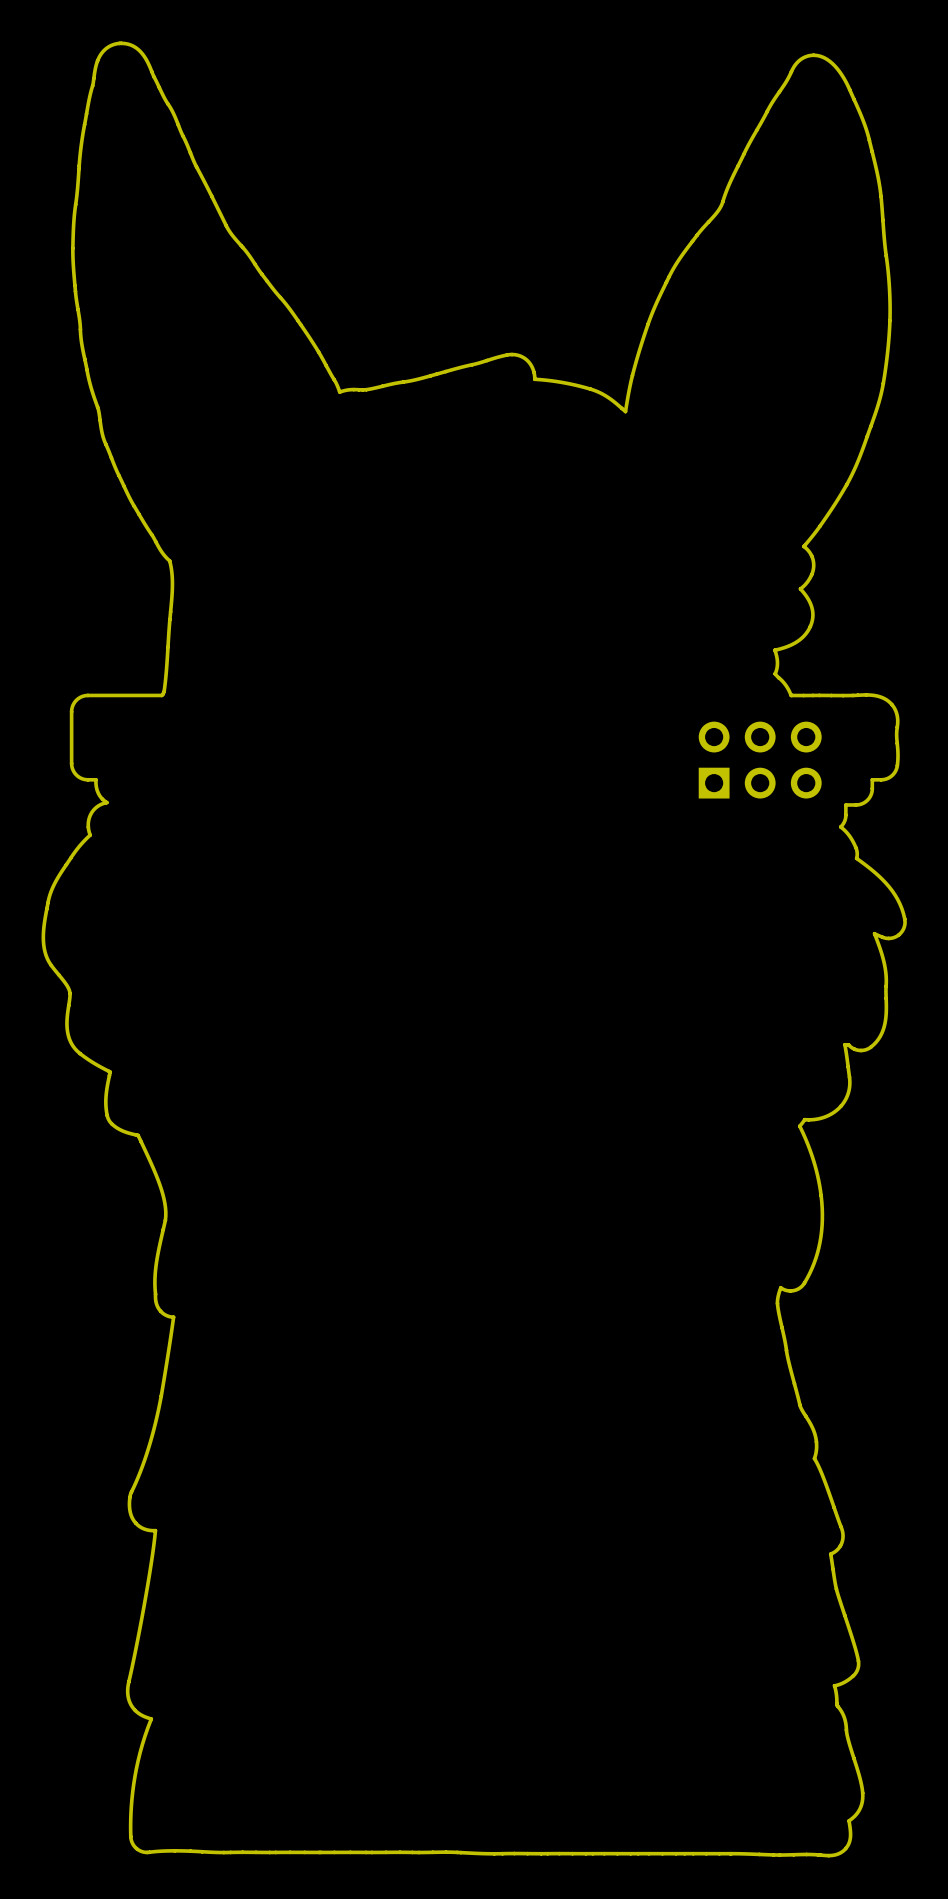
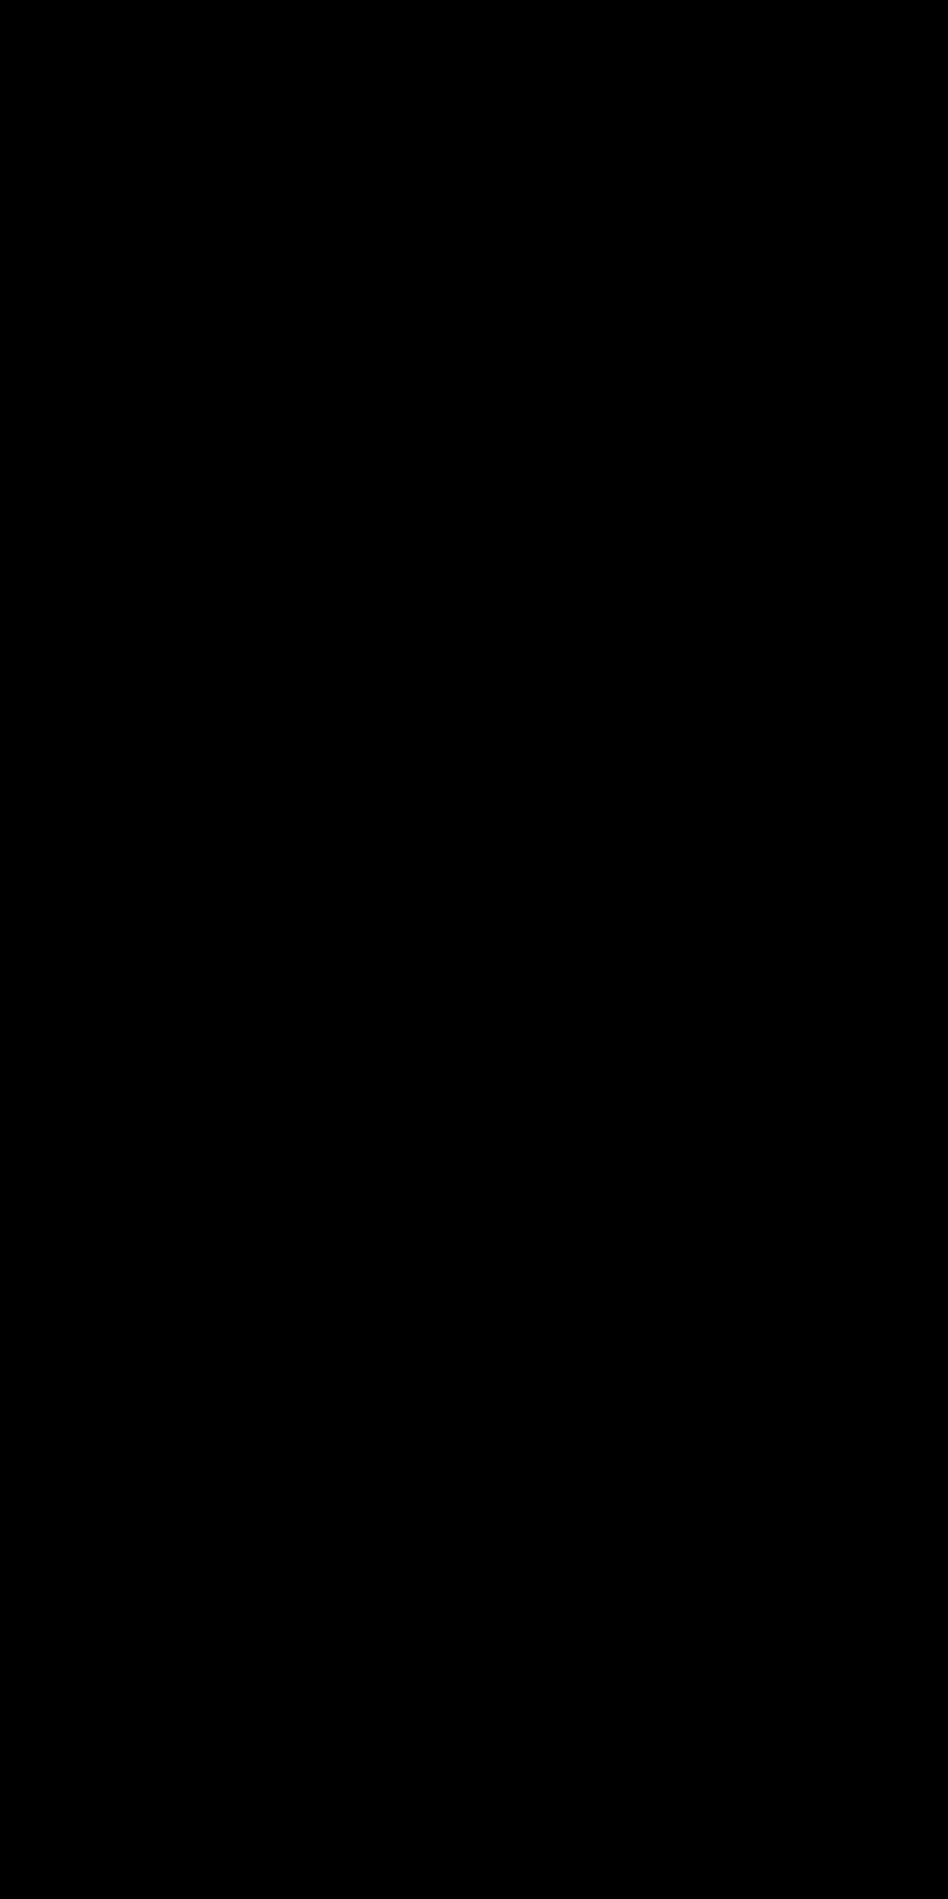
board edge: (121, 43) (133, 46) (145, 58) (227, 228) (303, 328) (320, 355) (339, 392) (368, 389) (413, 380) (513, 354) (521, 356) (528, 361) (533, 370) (534, 379) (562, 382) (593, 390) (608, 397) (625, 411) (631, 377) (642, 341) (653, 310) (669, 276) (686, 249) (719, 208) (748, 144) (796, 62) (804, 57) (813, 55) (823, 57) (832, 63) (846, 82) (862, 118) (879, 184) (888, 280) (889, 328) (883, 379) (876, 411) (852, 472) (831, 509) (803, 546) (810, 554) (813, 563) (810, 577) (800, 588) (811, 607) (812, 617) (810, 626) (797, 641) (774, 650) (777, 662) (775, 673) (785, 684) (791, 695) (877, 696) (891, 704) (897, 719) (897, 759) (895, 771) (886, 778) (872, 779) (871, 793) (865, 802) (857, 804) (845, 804) (845, 818) (840, 826) (853, 842) (856, 851) (856, 858) (878, 876) (892, 890) (899, 903) (904, 918) (903, 929) (896, 936) (886, 938) (874, 933) (885, 972) (884, 1023) (878, 1039) (868, 1048) (858, 1050) (844, 1044) (849, 1085) (847, 1096) (841, 1105) (824, 1117) (804, 1119) (799, 1126) (811, 1153) (818, 1180) (822, 1207) (820, 1237) (813, 1263) (803, 1283) (793, 1290) (780, 1287) (777, 1301) (787, 1357) (799, 1405) (815, 1436) (816, 1447) (814, 1458) (823, 1477) (842, 1531) (840, 1545) (830, 1554) (836, 1589) (858, 1662) (857, 1669) (854, 1675) (844, 1682) (834, 1685) (837, 1705) (845, 1720) (862, 1796) (859, 1810) (849, 1820) (849, 1842) (845, 1849) (838, 1853) (828, 1855) (176, 1850) (147, 1852) (138, 1849) (132, 1842) (130, 1819) (133, 1784) (140, 1752) (151, 1718) (141, 1715) (133, 1708) (128, 1699) (127, 1689) (145, 1595) (155, 1530) (144, 1529) (135, 1523) (130, 1513) (129, 1501) (155, 1422) (173, 1317) (161, 1311) (155, 1298) (155, 1266) (165, 1220) (165, 1207) (158, 1179) (138, 1135) (118, 1128) (107, 1118) (105, 1099) (110, 1072) (82, 1055) (70, 1042) (66, 1023) (69, 991) (47, 958) (43, 937) (47, 902) (52, 887) (74, 853) (90, 835) (88, 822) (91, 813) (98, 806) (106, 802) (98, 793) (95, 779) (80, 777) (72, 768) (72, 705) (78, 698) (86, 695) (161, 695) (166, 672) (172, 588) (170, 563) (130, 499) (103, 438) (82, 346) (73, 269) (73, 225) (80, 153) (95, 68) (98, 58) (104, 50) (112, 45) (121, 43) -> none
part: (760, 760) -> none

